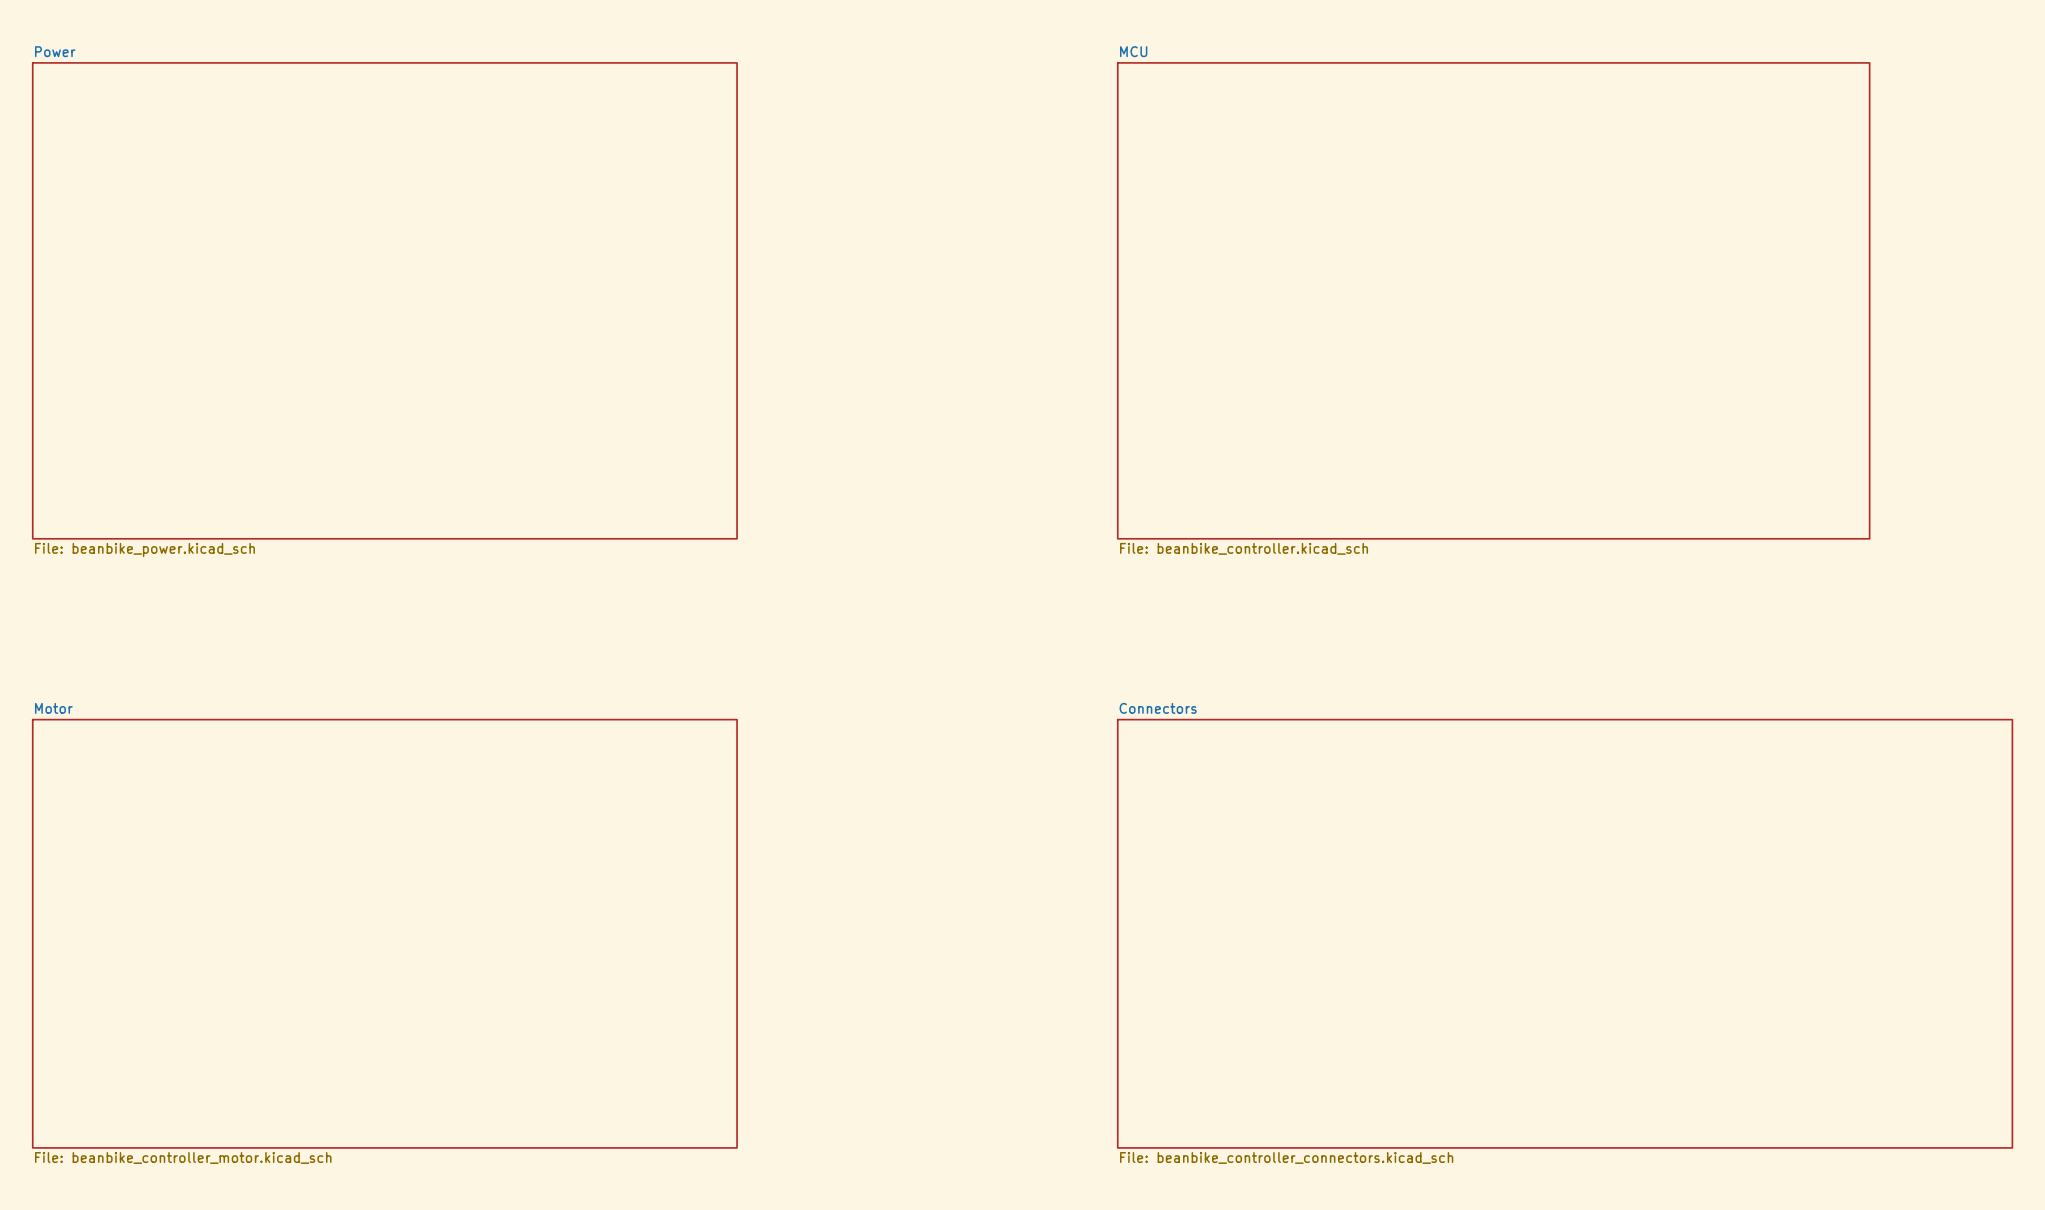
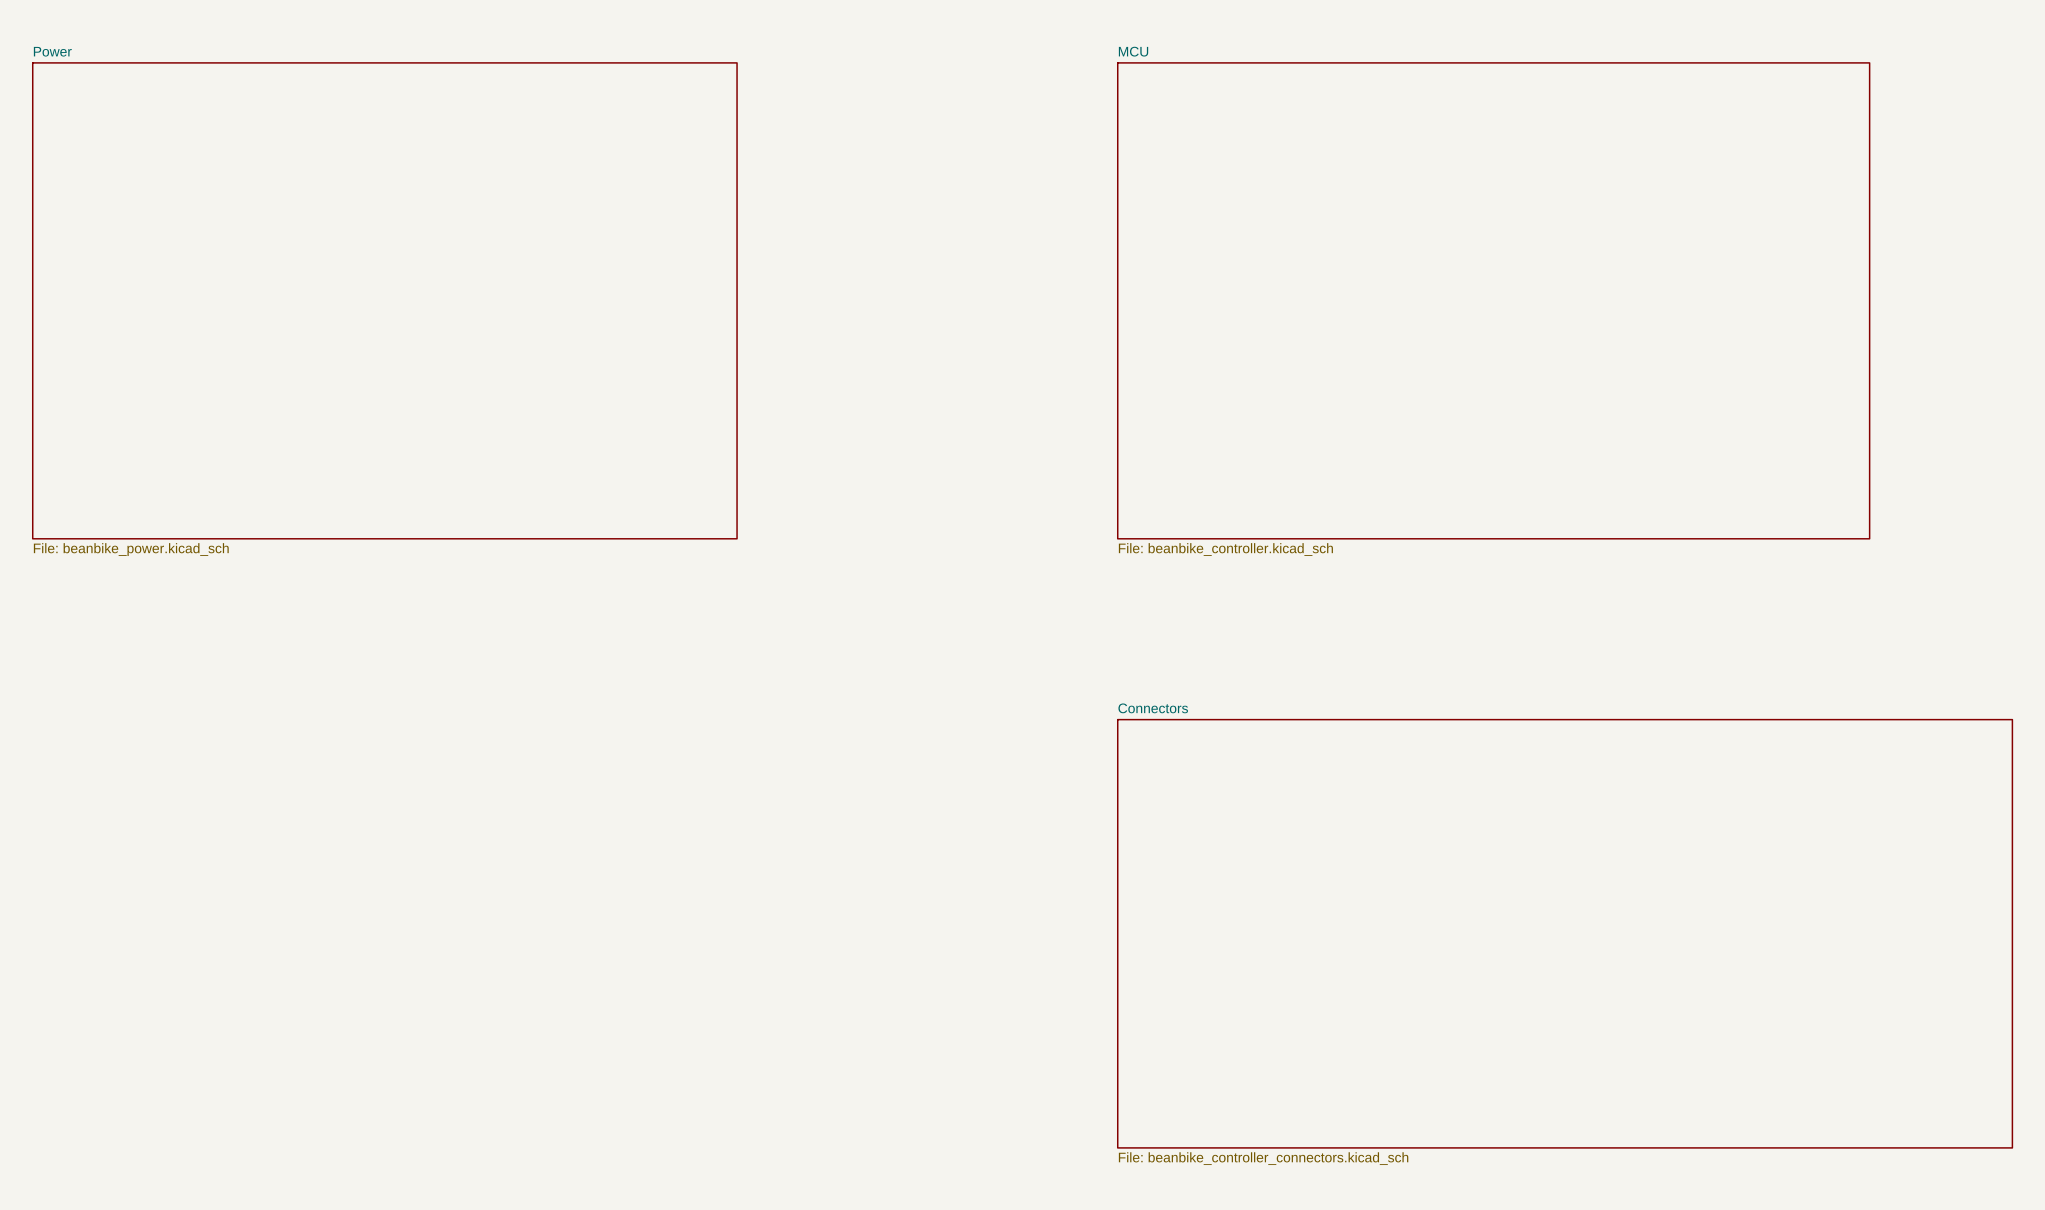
sheet Motor: File: beanbike_controller_motor.kicad_sch (384, 933) -> none

